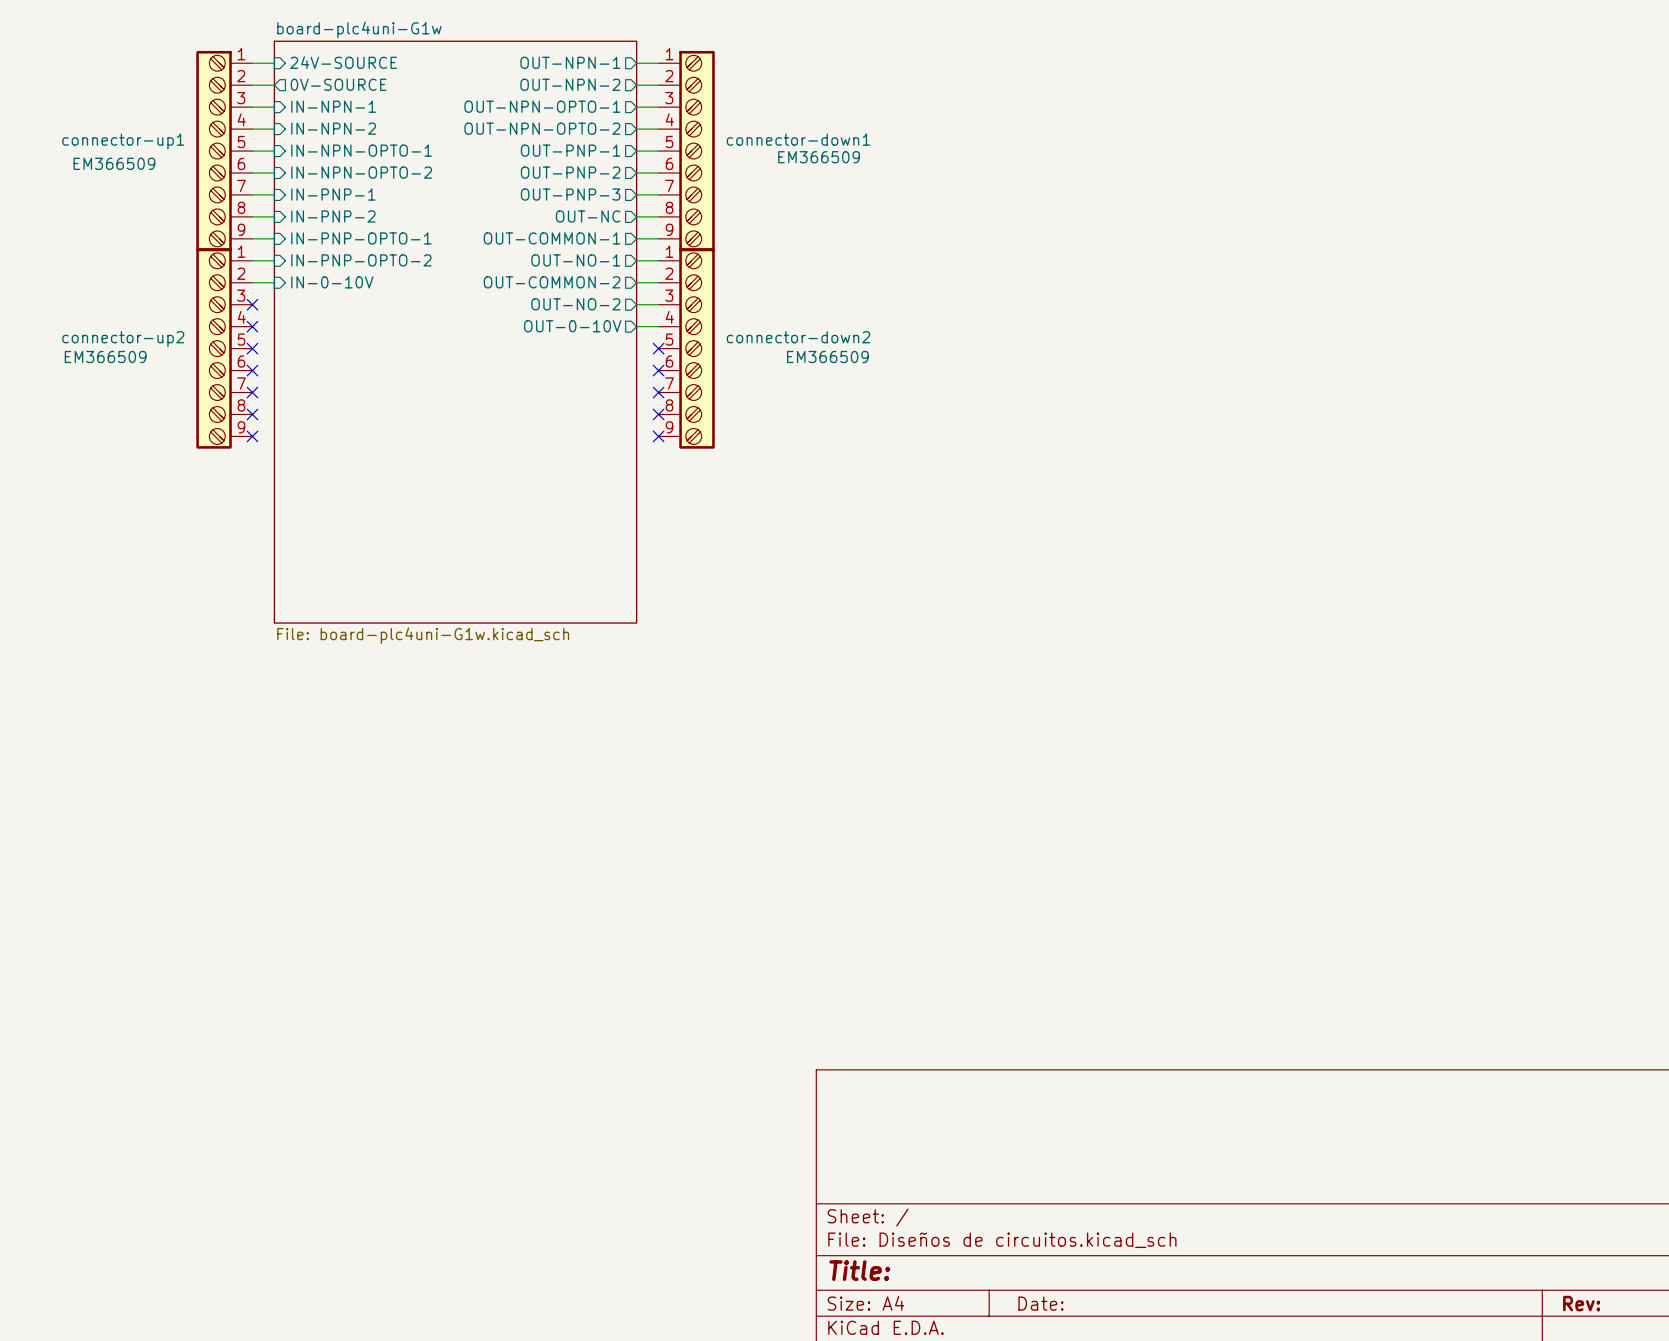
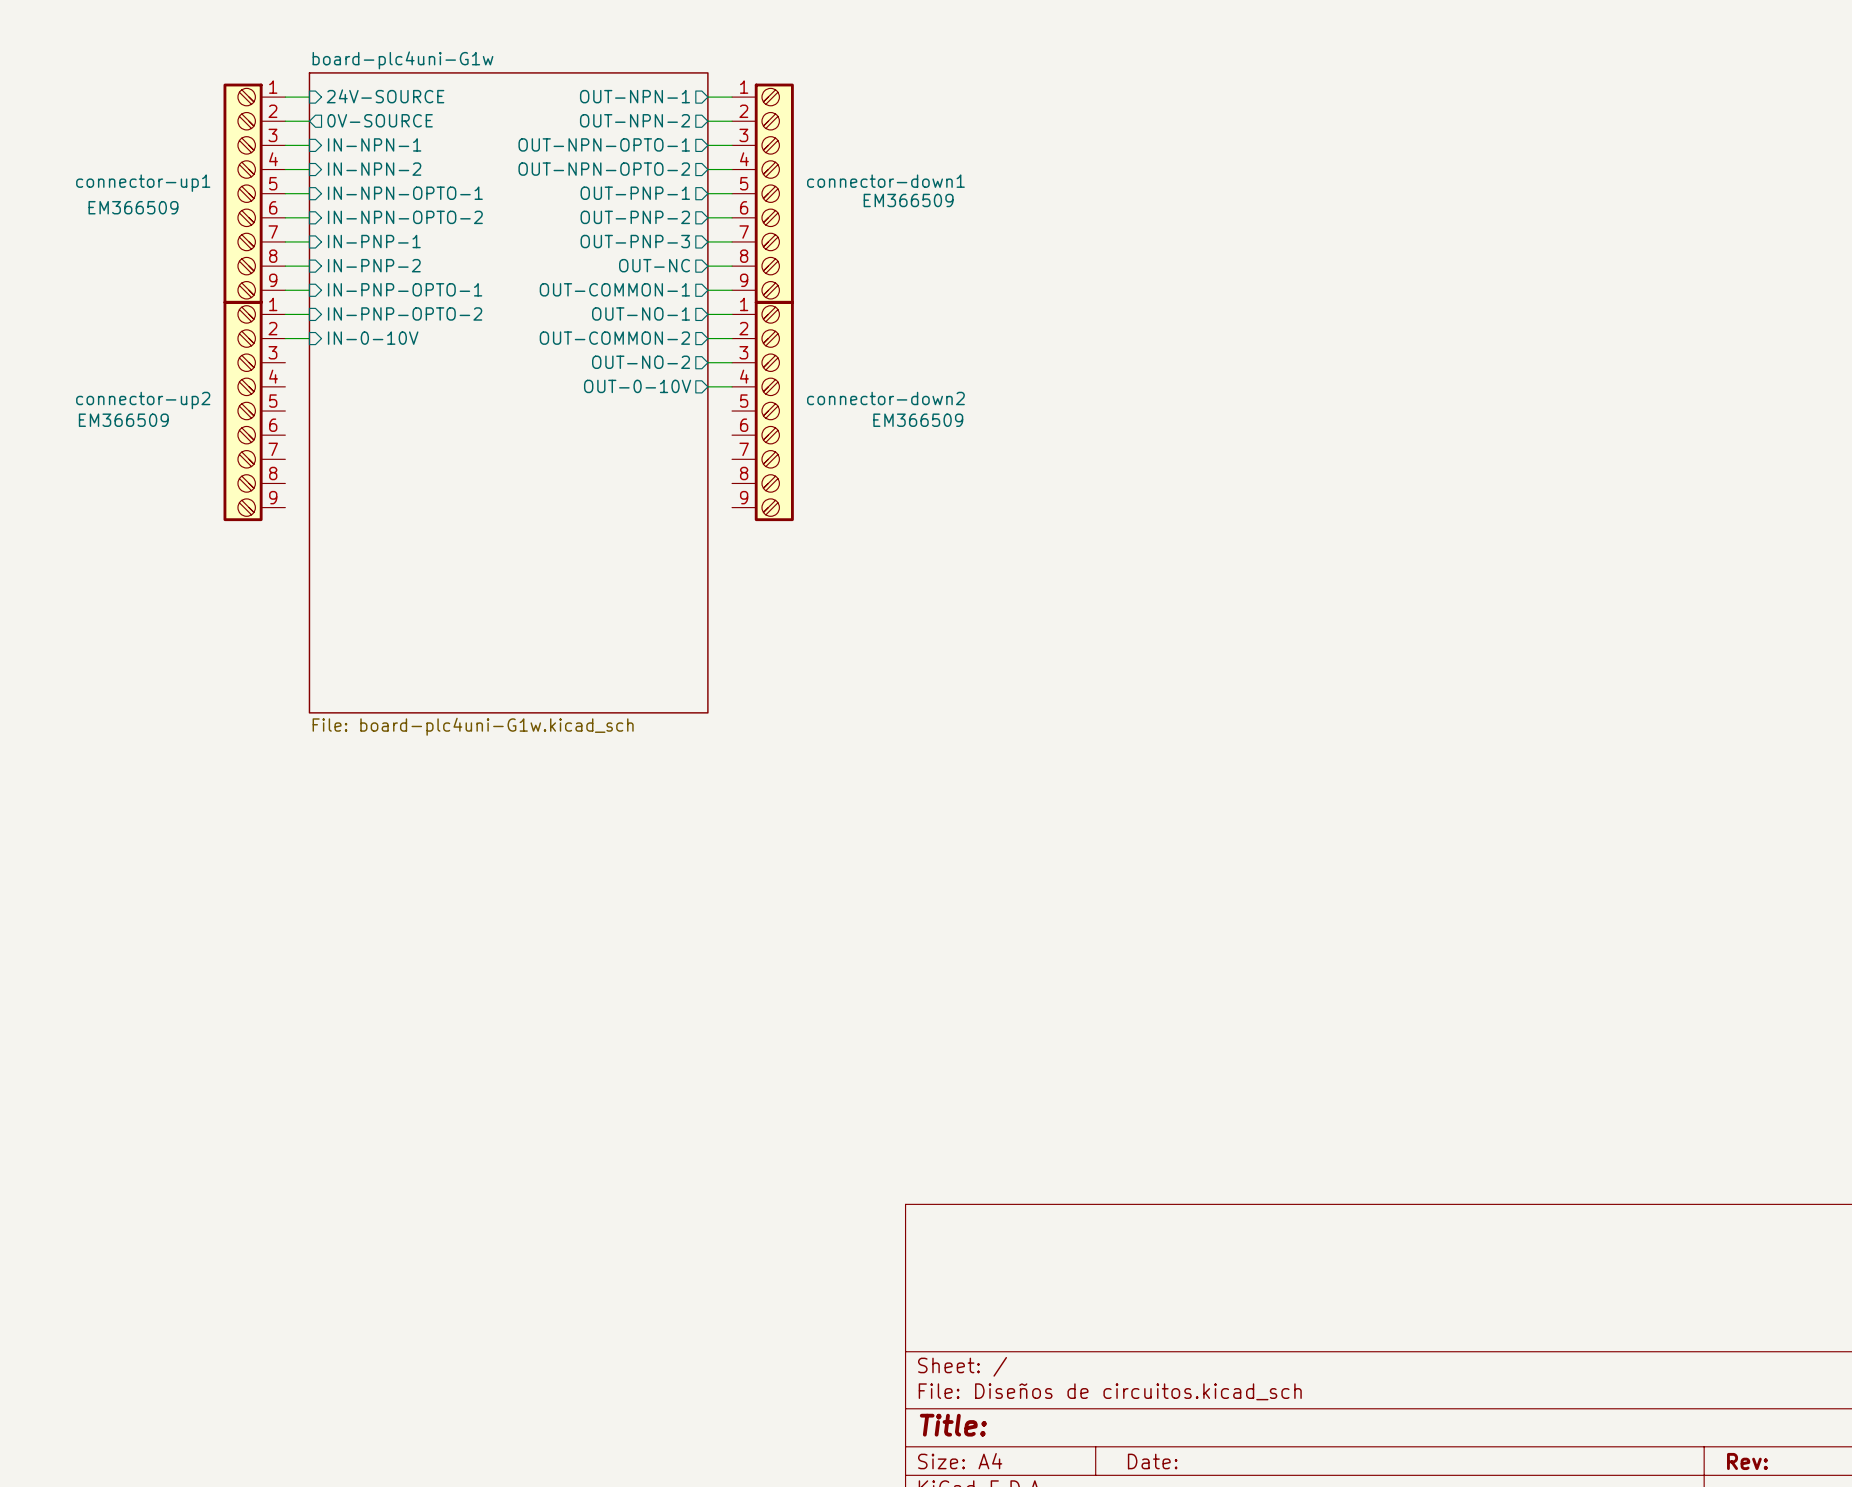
no-connect mark: (252, 304) -> none
no-connect mark: (252, 326) -> none
no-connect mark: (252, 348) -> none
no-connect mark: (658, 348) -> none
no-connect mark: (252, 370) -> none
no-connect mark: (658, 370) -> none
no-connect mark: (252, 392) -> none
no-connect mark: (658, 392) -> none
no-connect mark: (252, 414) -> none
no-connect mark: (658, 414) -> none
no-connect mark: (252, 436) -> none
no-connect mark: (658, 436) -> none

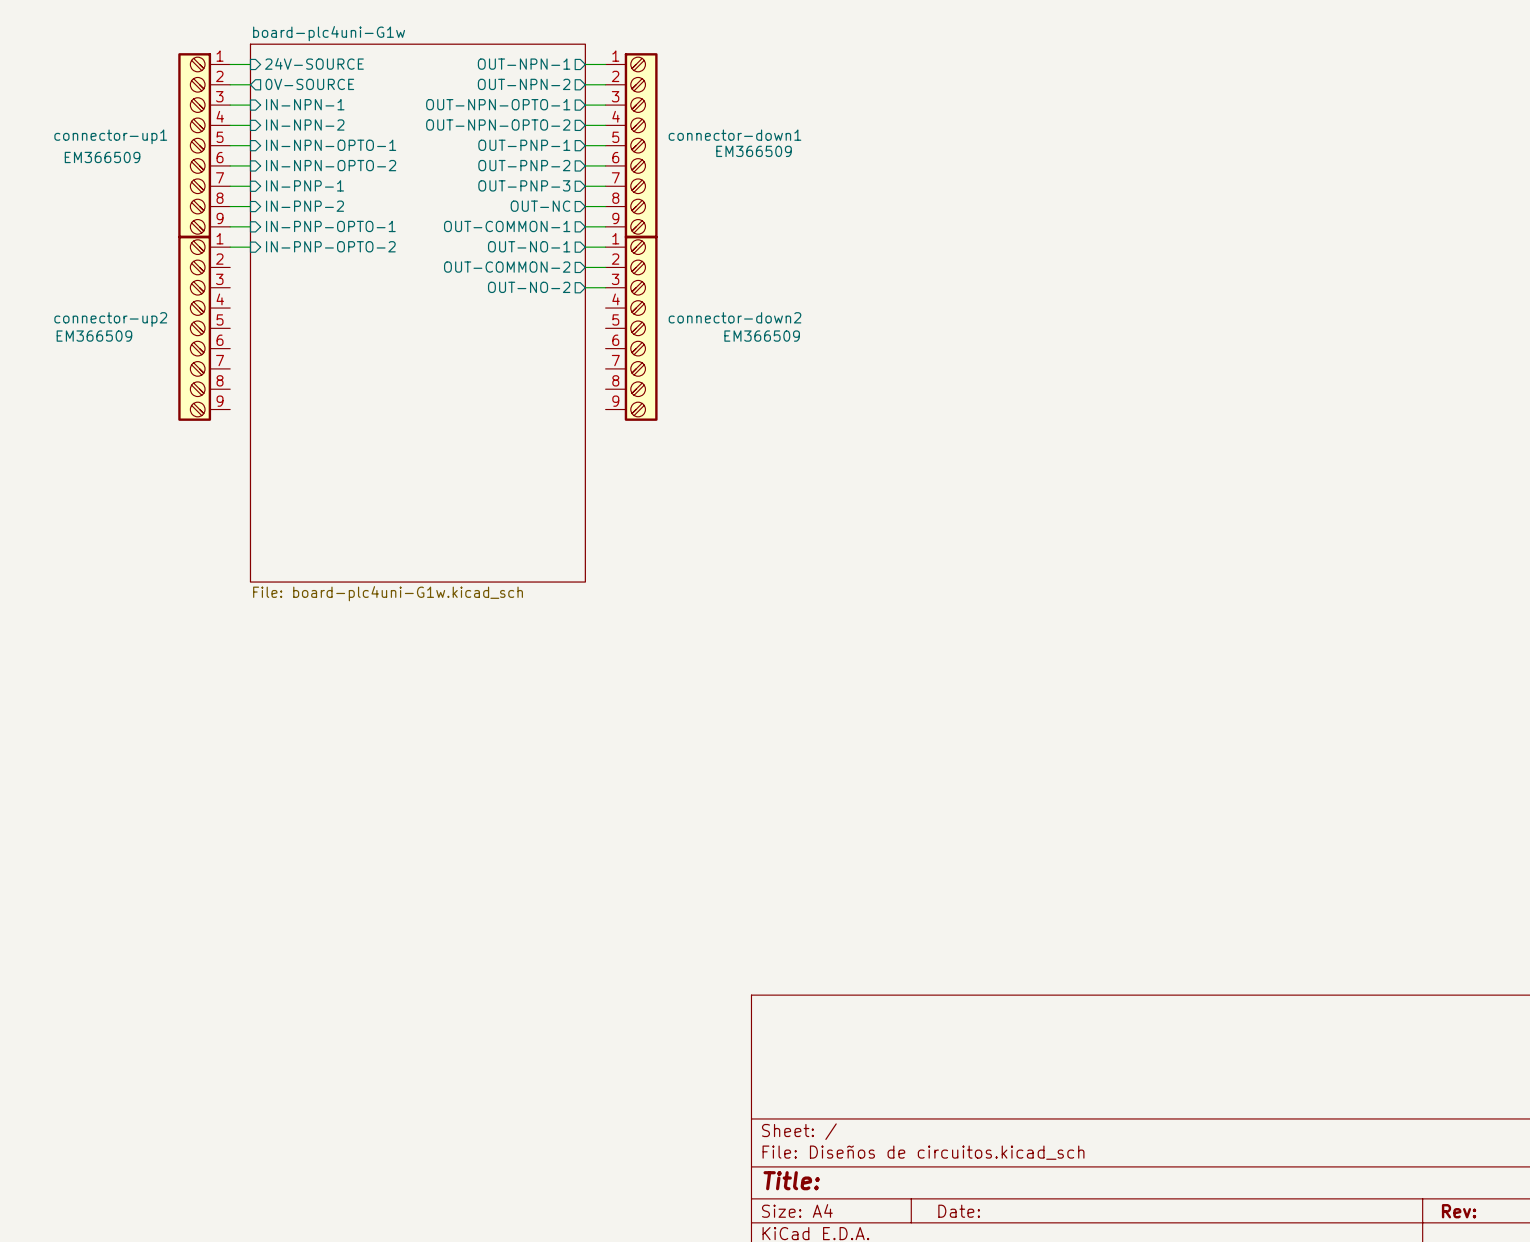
wire: (285, 338) (309, 338) -> none
sheet pin: IN-0-10V (373, 338) -> none
sheet pin: OUT-0-10V (637, 386) -> none
wire: (707, 386) (732, 386) -> none

